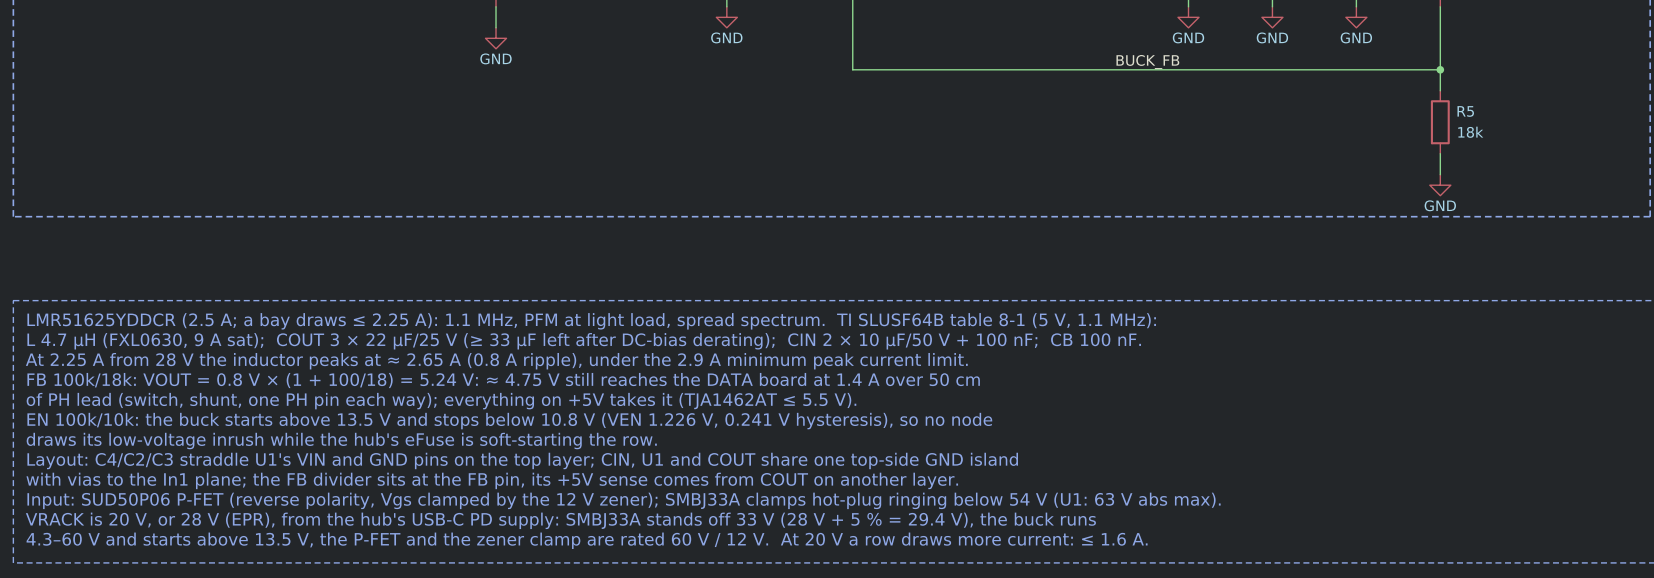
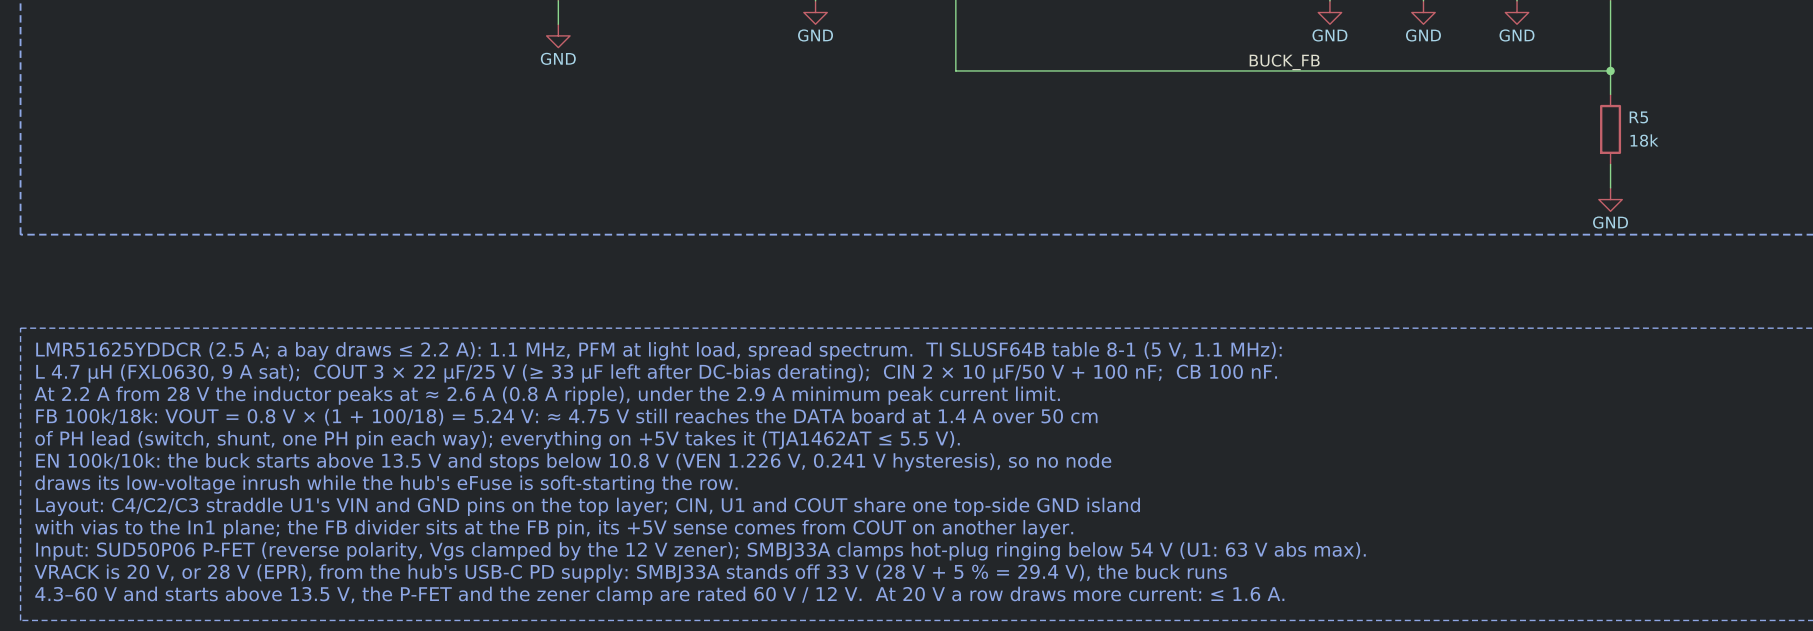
text: LMR51625YDDCR (2.5 A; a bay draws ≤ 2.25 A): 1.1 MHz, PFM at light load, spread spectrum. TI SLUSF64B table 8-1 (5 V, 1.1 MHz): (591, 321) -> LMR51625YDDCR (2.5 A; a bay draws ≤ 2.2 A): 1.1 MHz, PFM at light load, spread spectrum. TI SLUSF64B table 8-1 (5 V, 1.1 MHz): (658, 351)
text: At 2.25 A from 28 V the inductor peaks at ≈ 2.65 A (0.8 A ripple), under the 2.9 A minimum peak current limit. (496, 361) -> At 2.2 A from 28 V the inductor peaks at ≈ 2.6 A (0.8 A ripple), under the 2.9 A minimum peak current limit. (547, 395)

